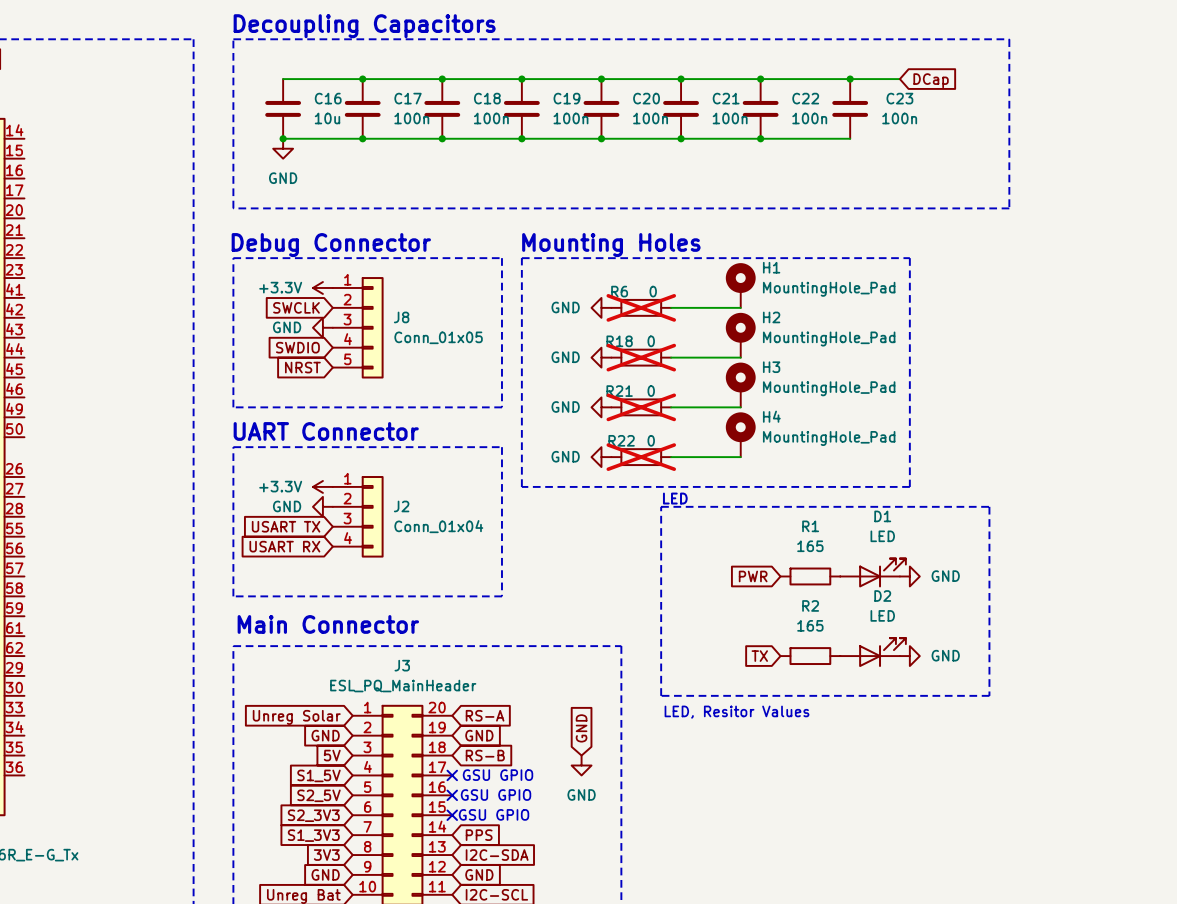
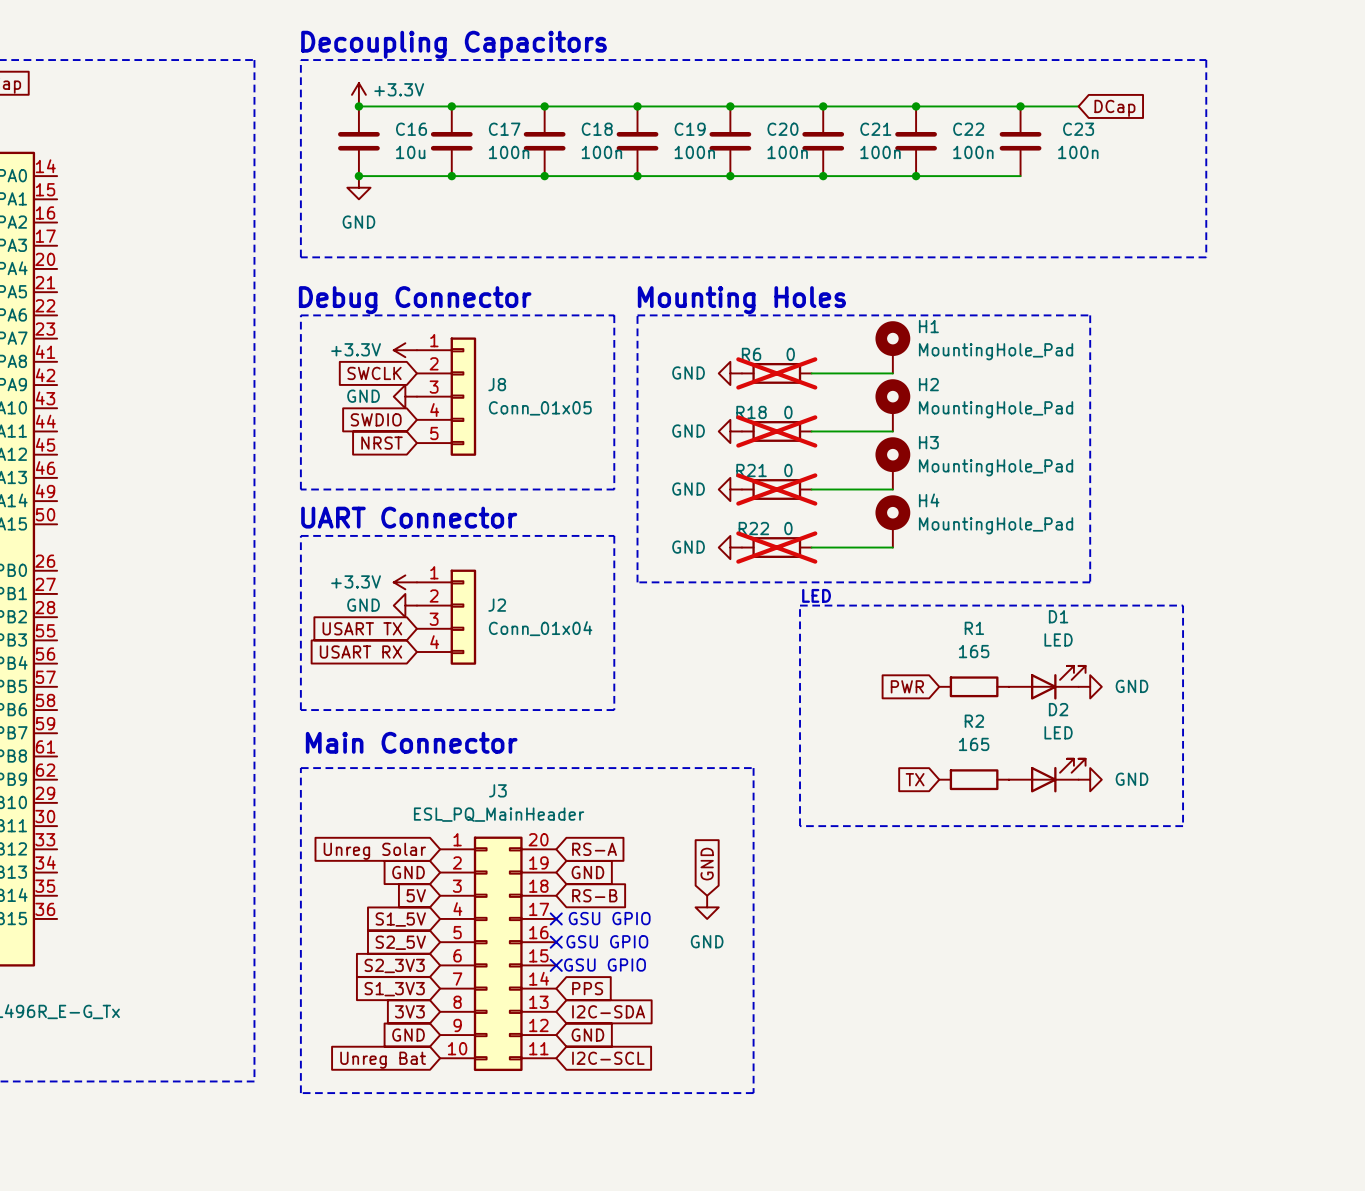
power symbol: none -> +3.3V (358, 94)
junction: none -> (358, 106)
text: LED, Resitor Values (737, 712) -> none

